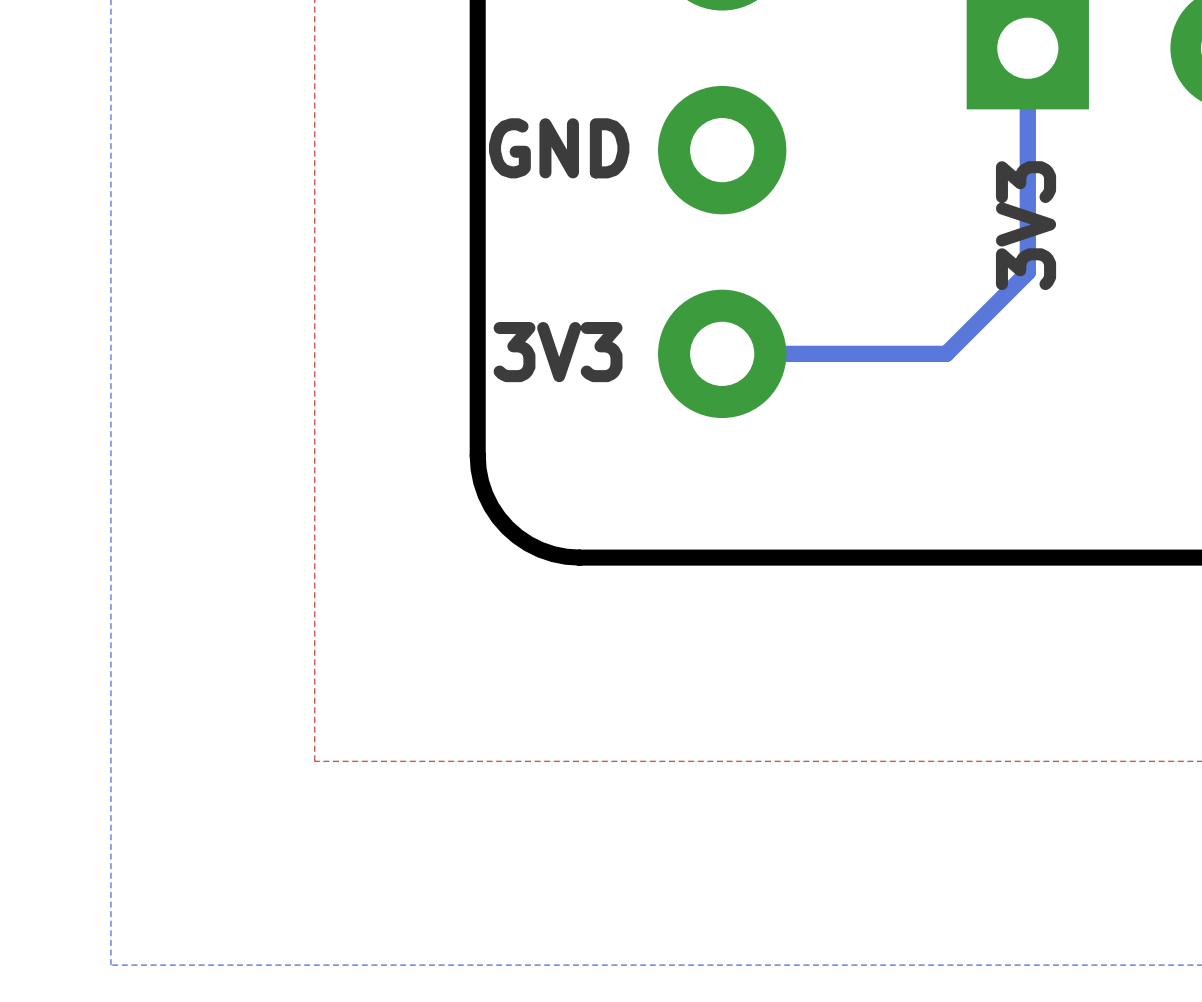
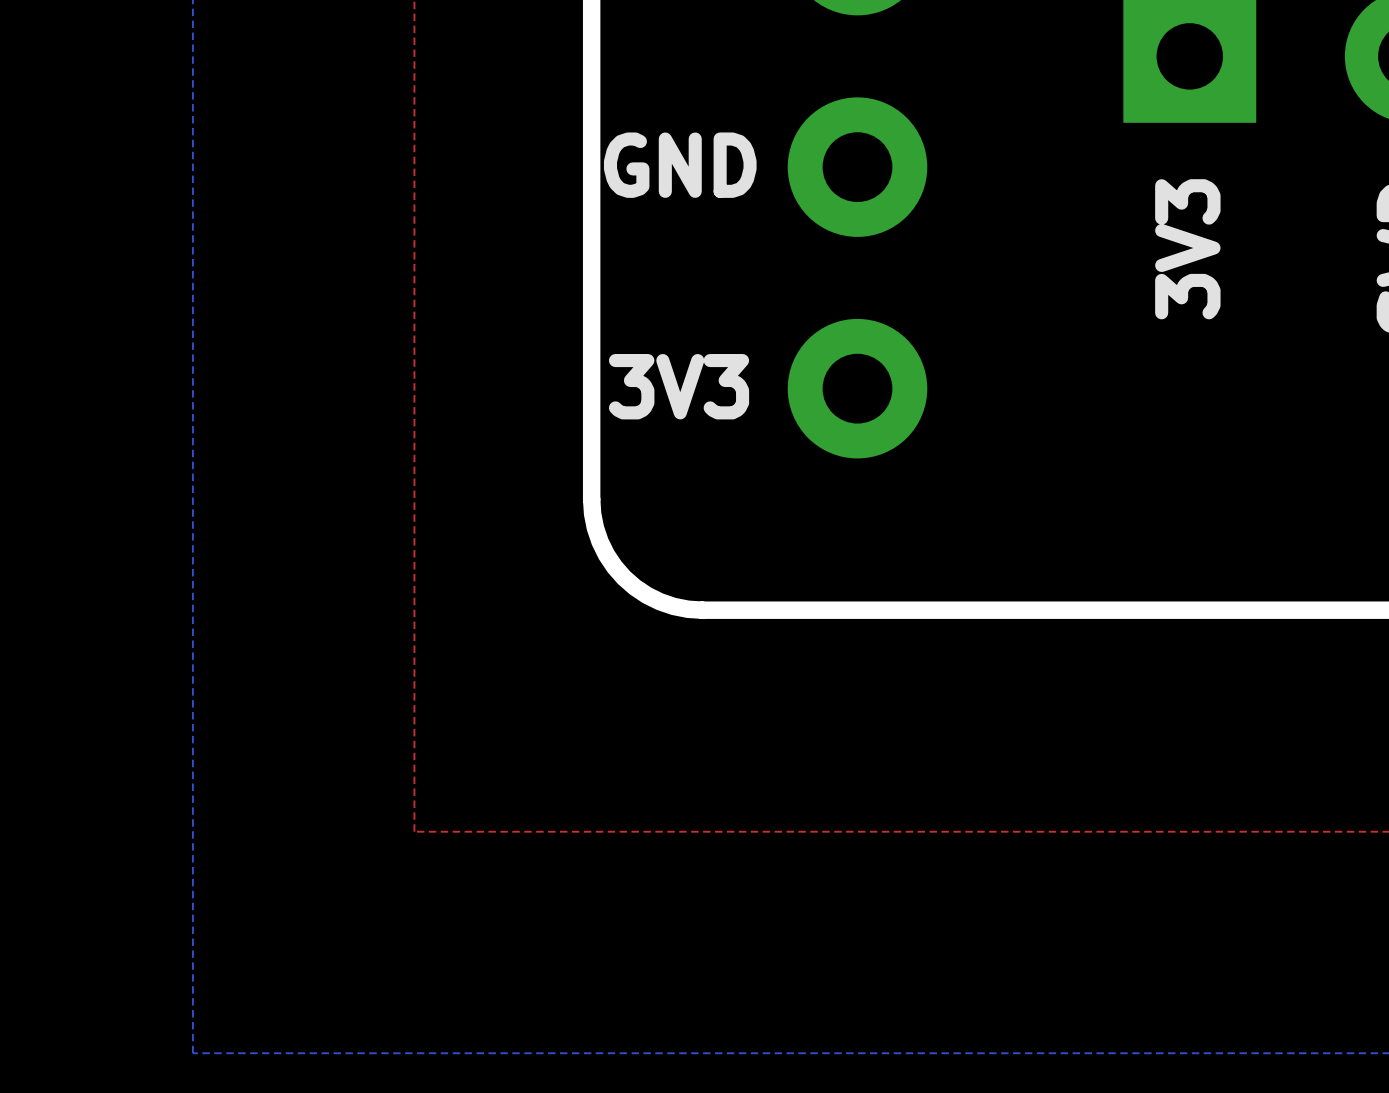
bottom track: (1027, 48) (1027, 272) (946, 353) (722, 353) -> none

